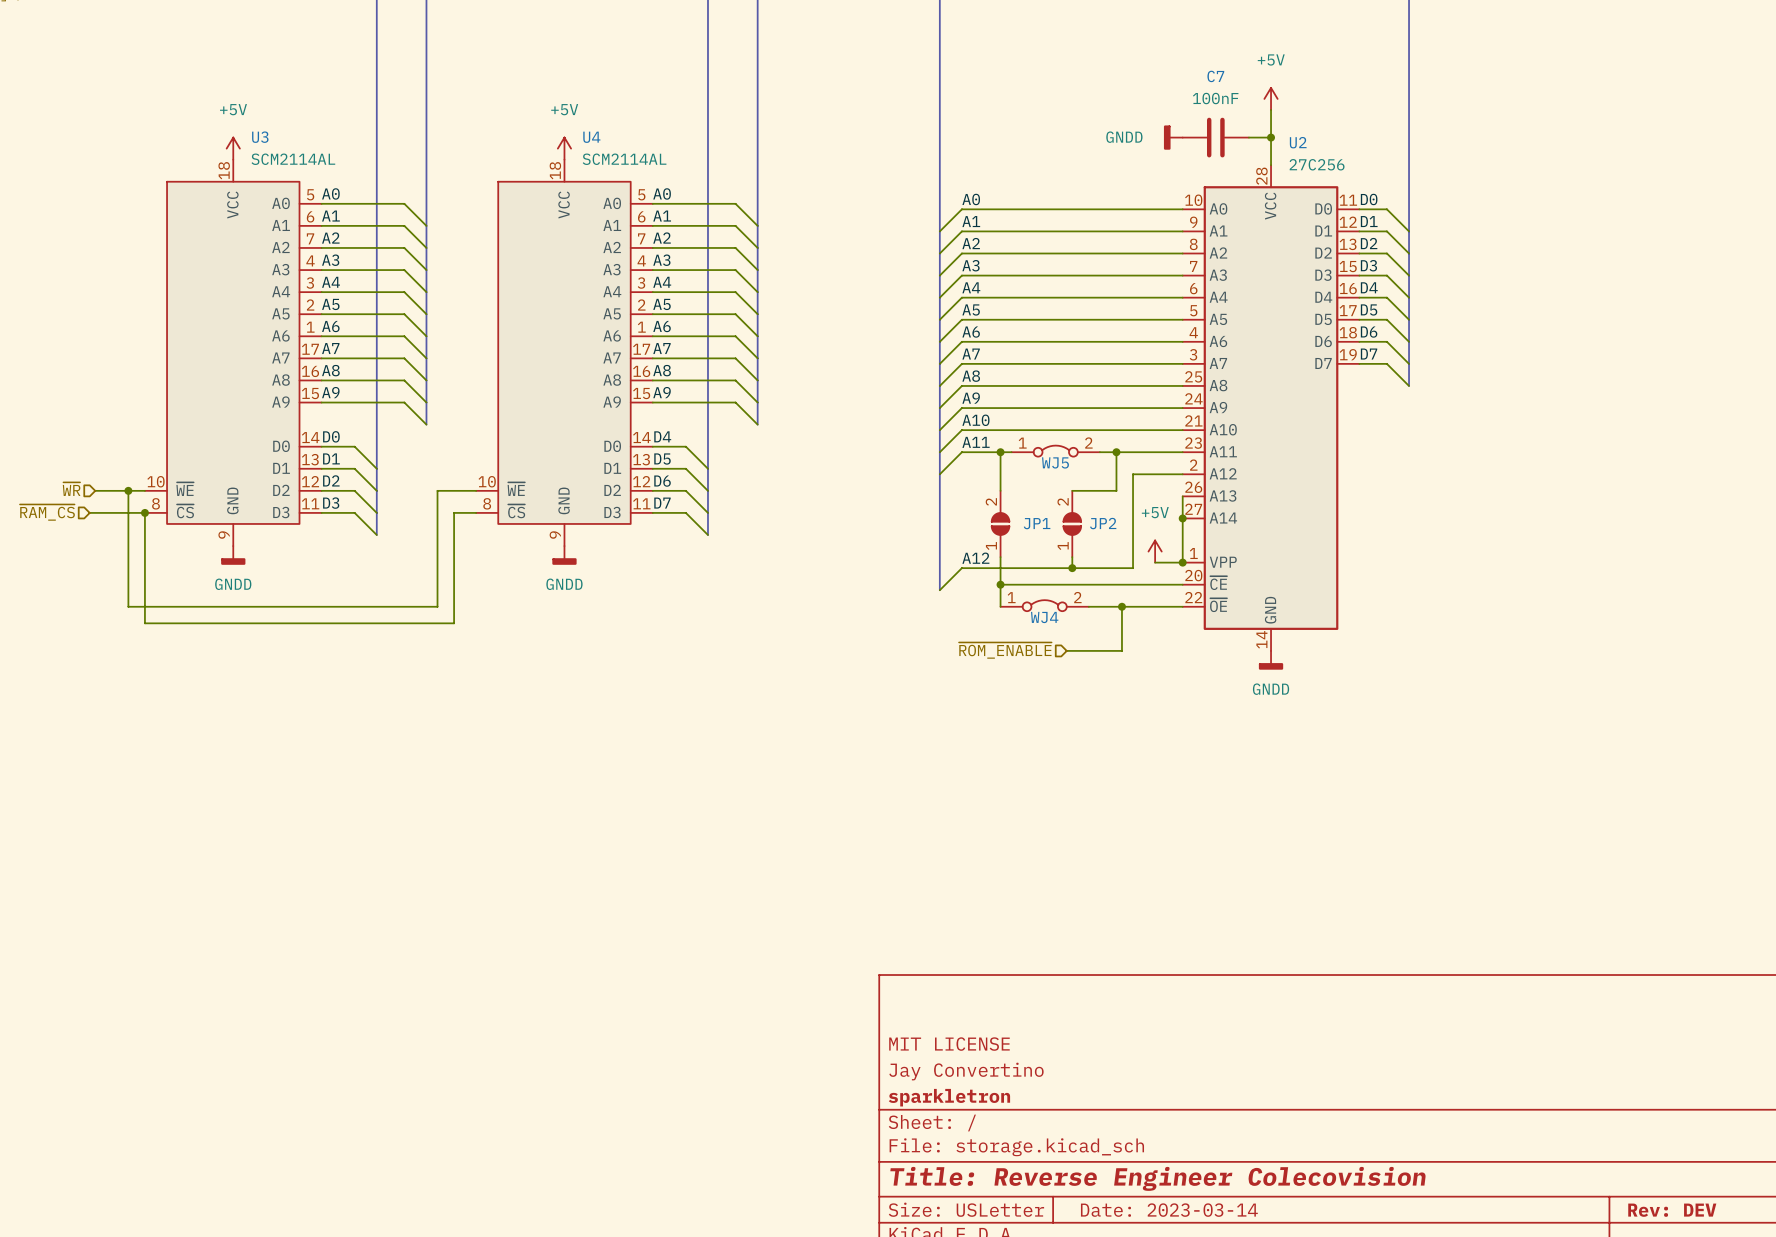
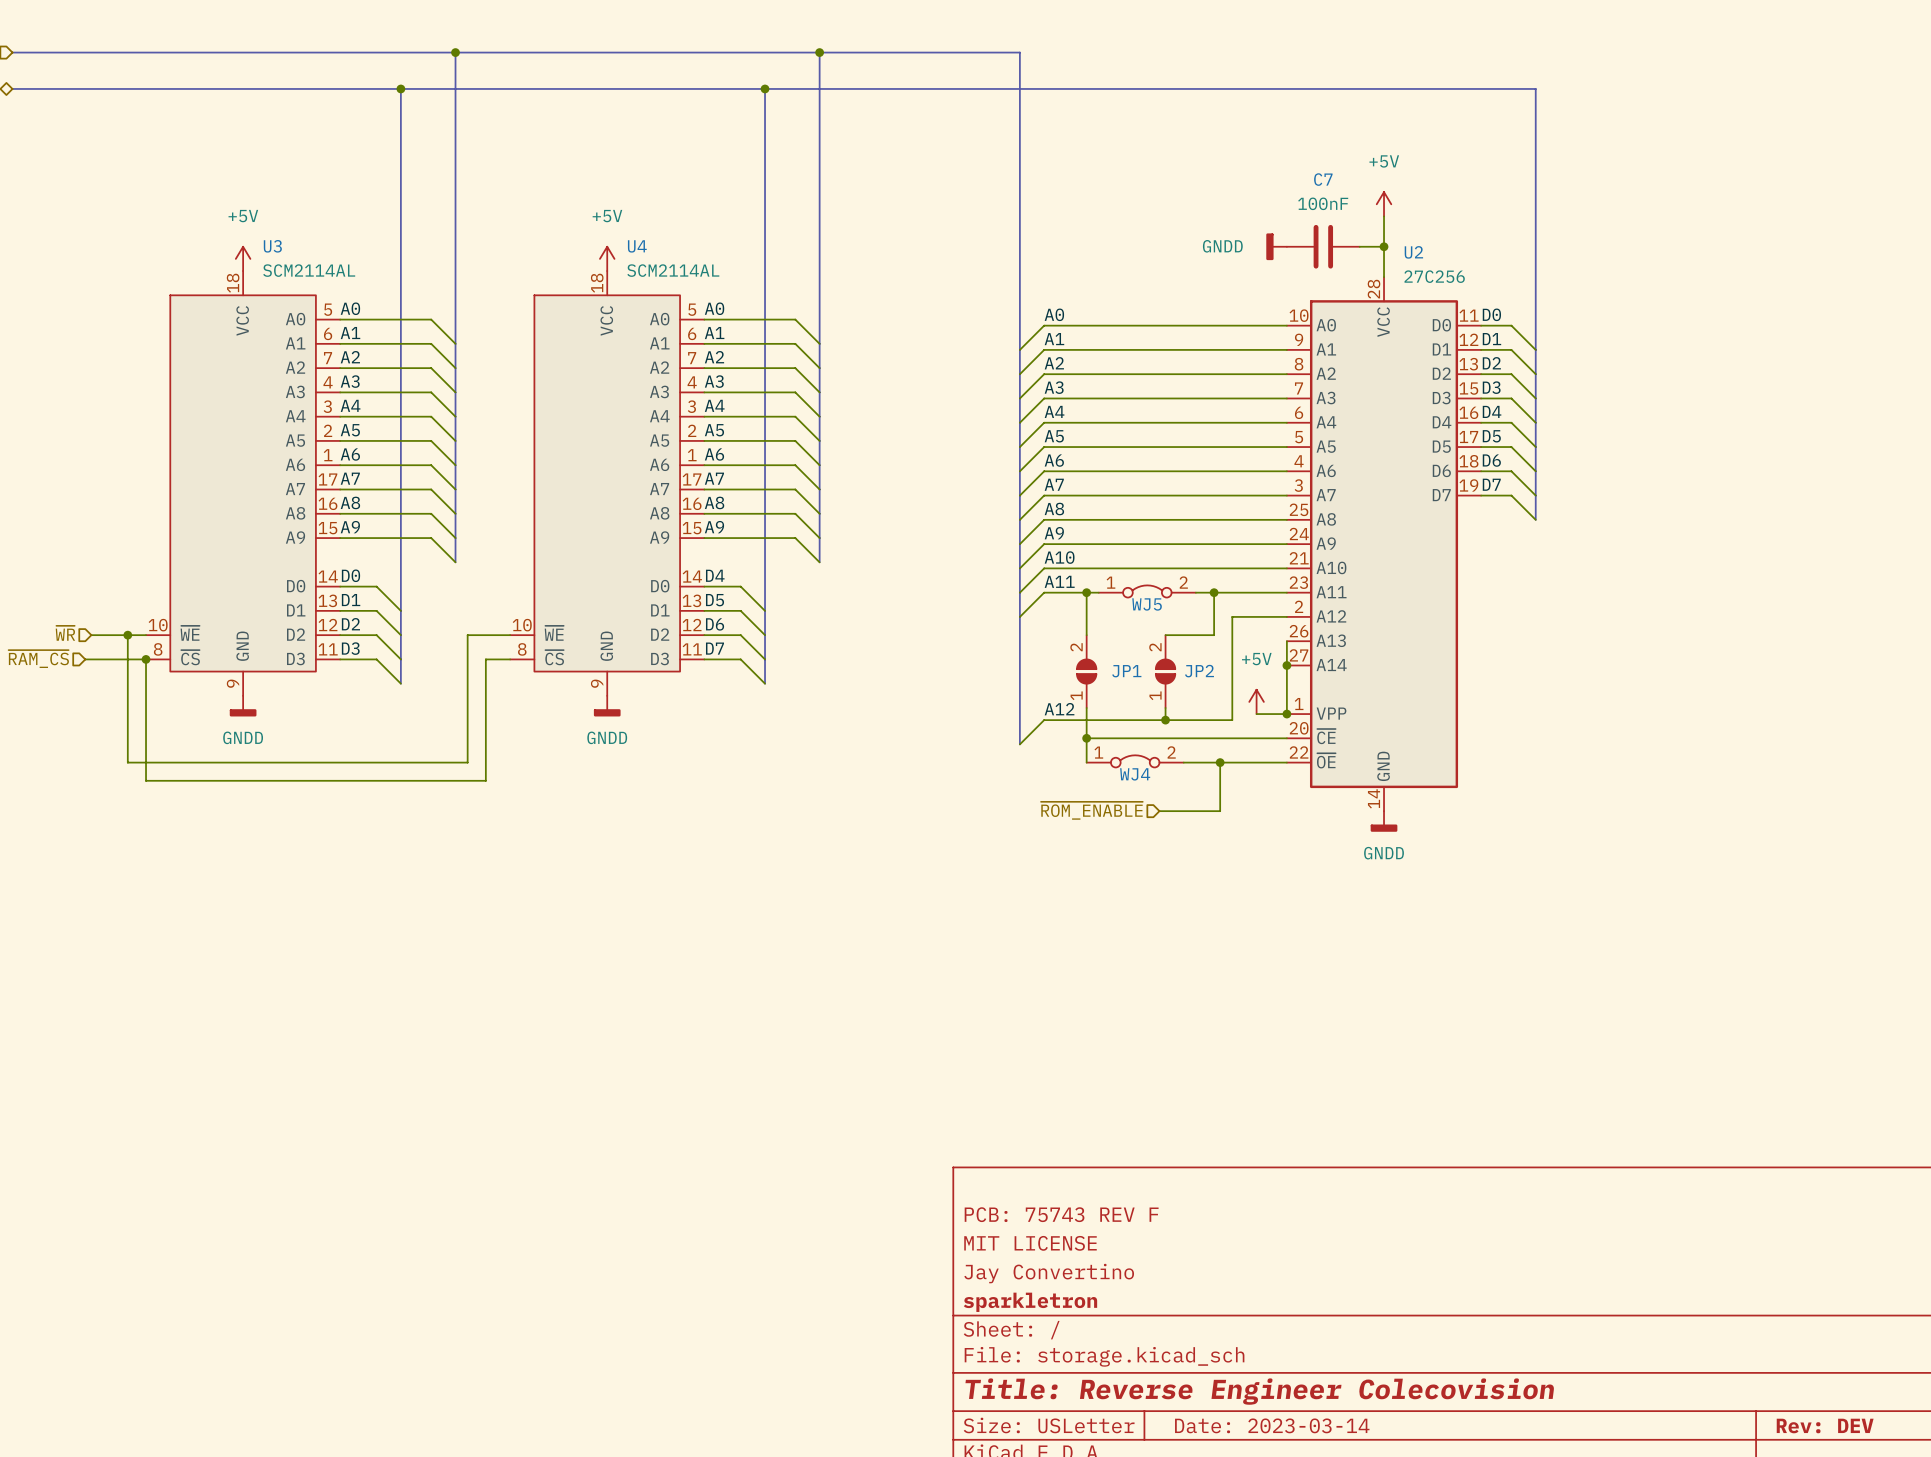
title block: none -> PCB: 75743 REV F (1061, 1214)

